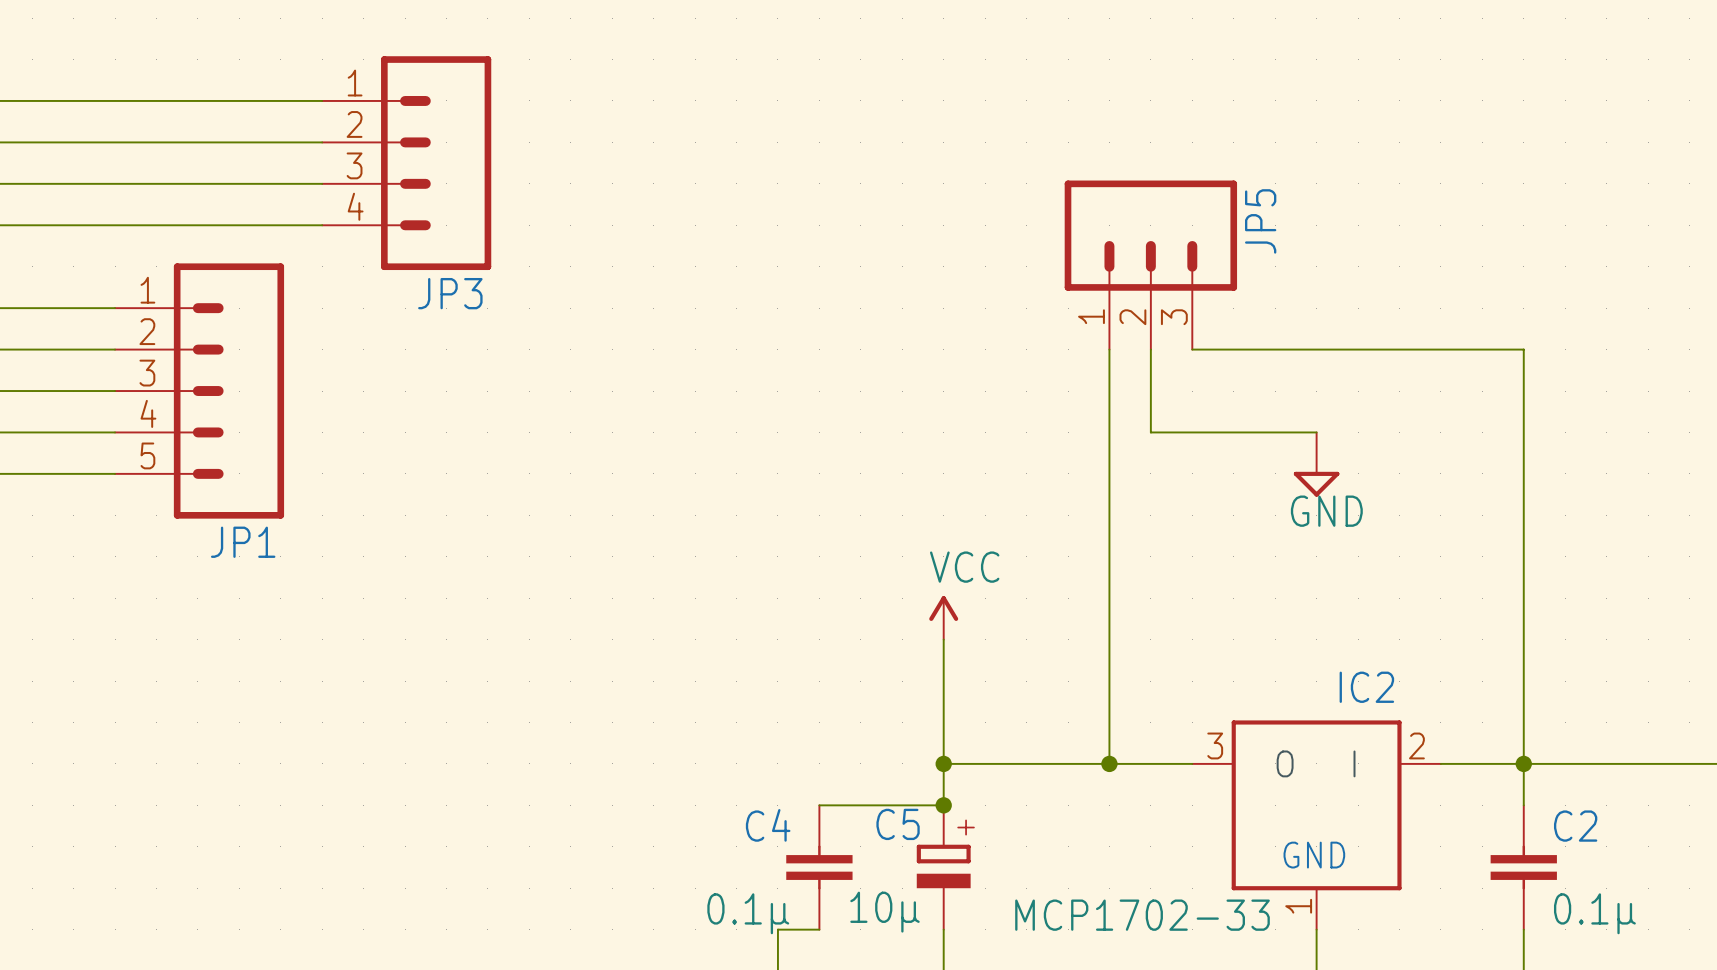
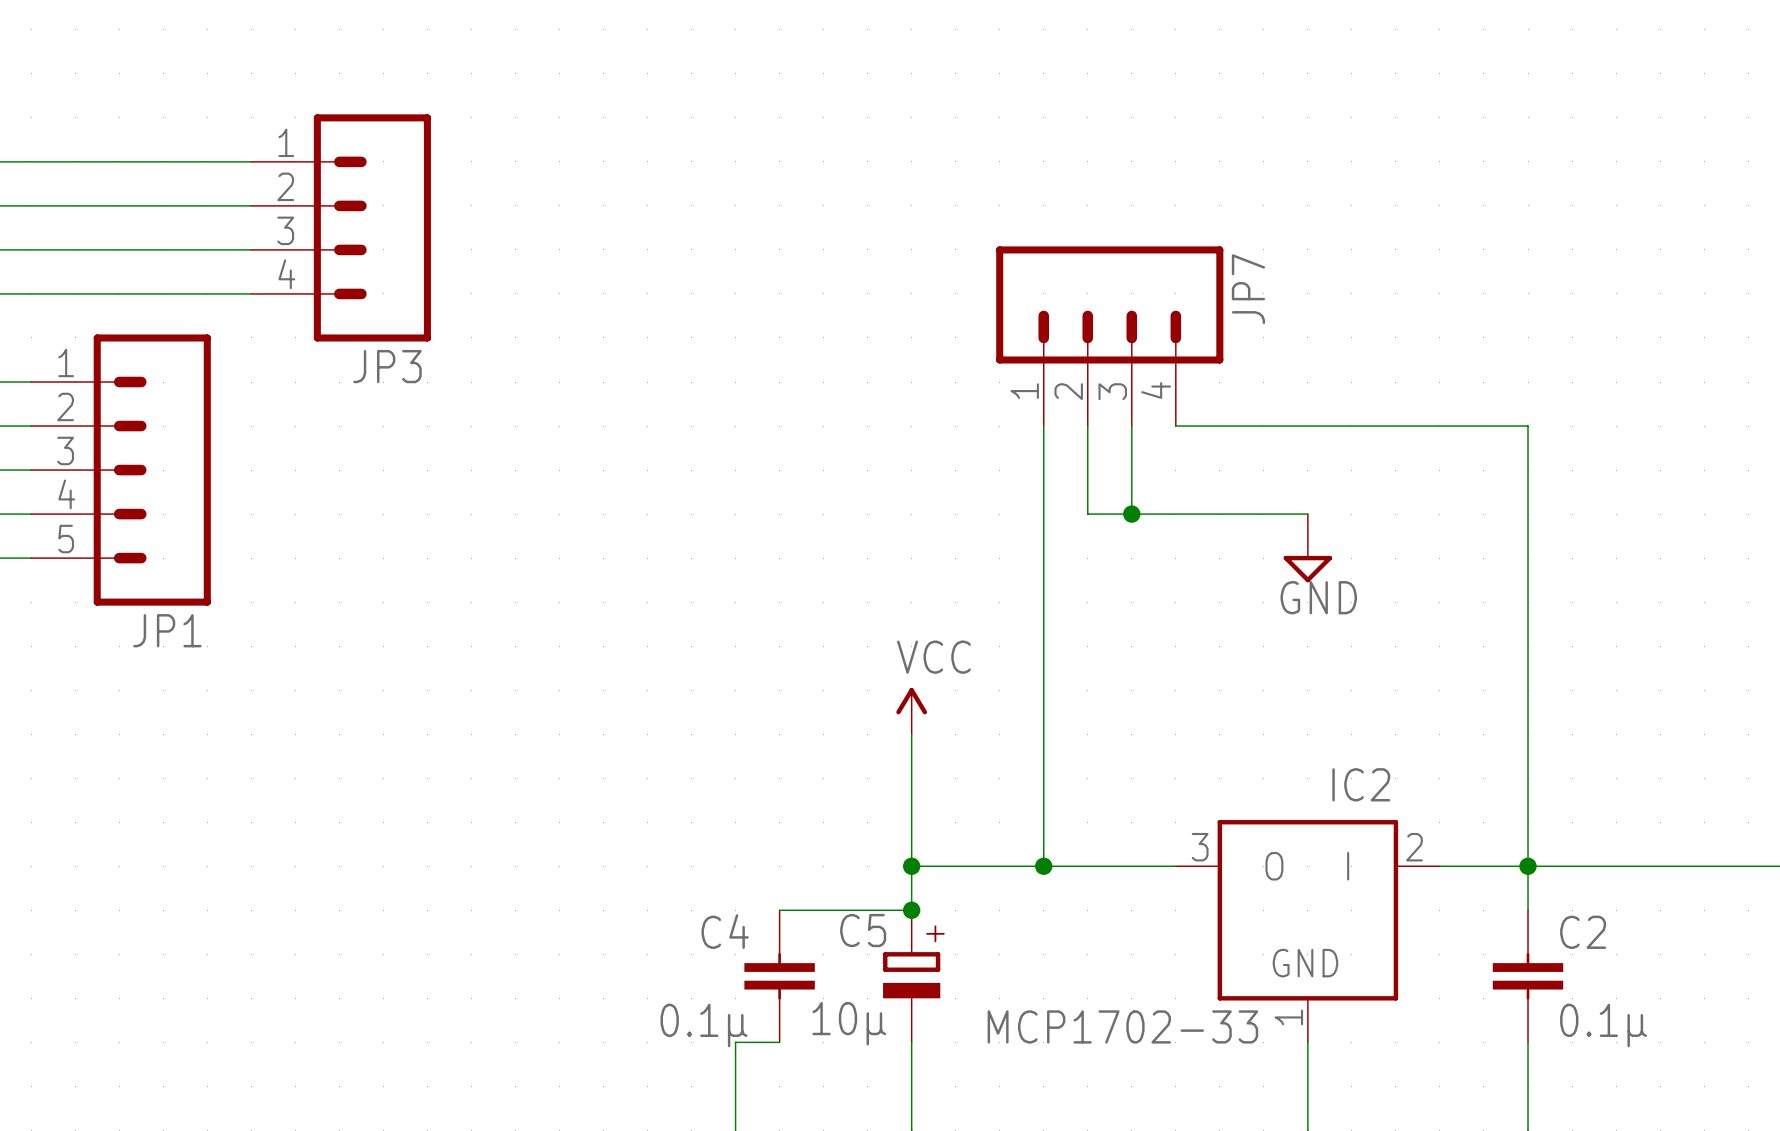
JP7: none -> (1109, 336)
JP5: (1150, 265) -> none
wire: none -> (1043, 426) (1043, 866)
wire: (1109, 432) (1109, 763) -> (1087, 514) (1131, 514)
junction: none -> (1131, 514)
junction position: (1109, 763) -> (1043, 866)

